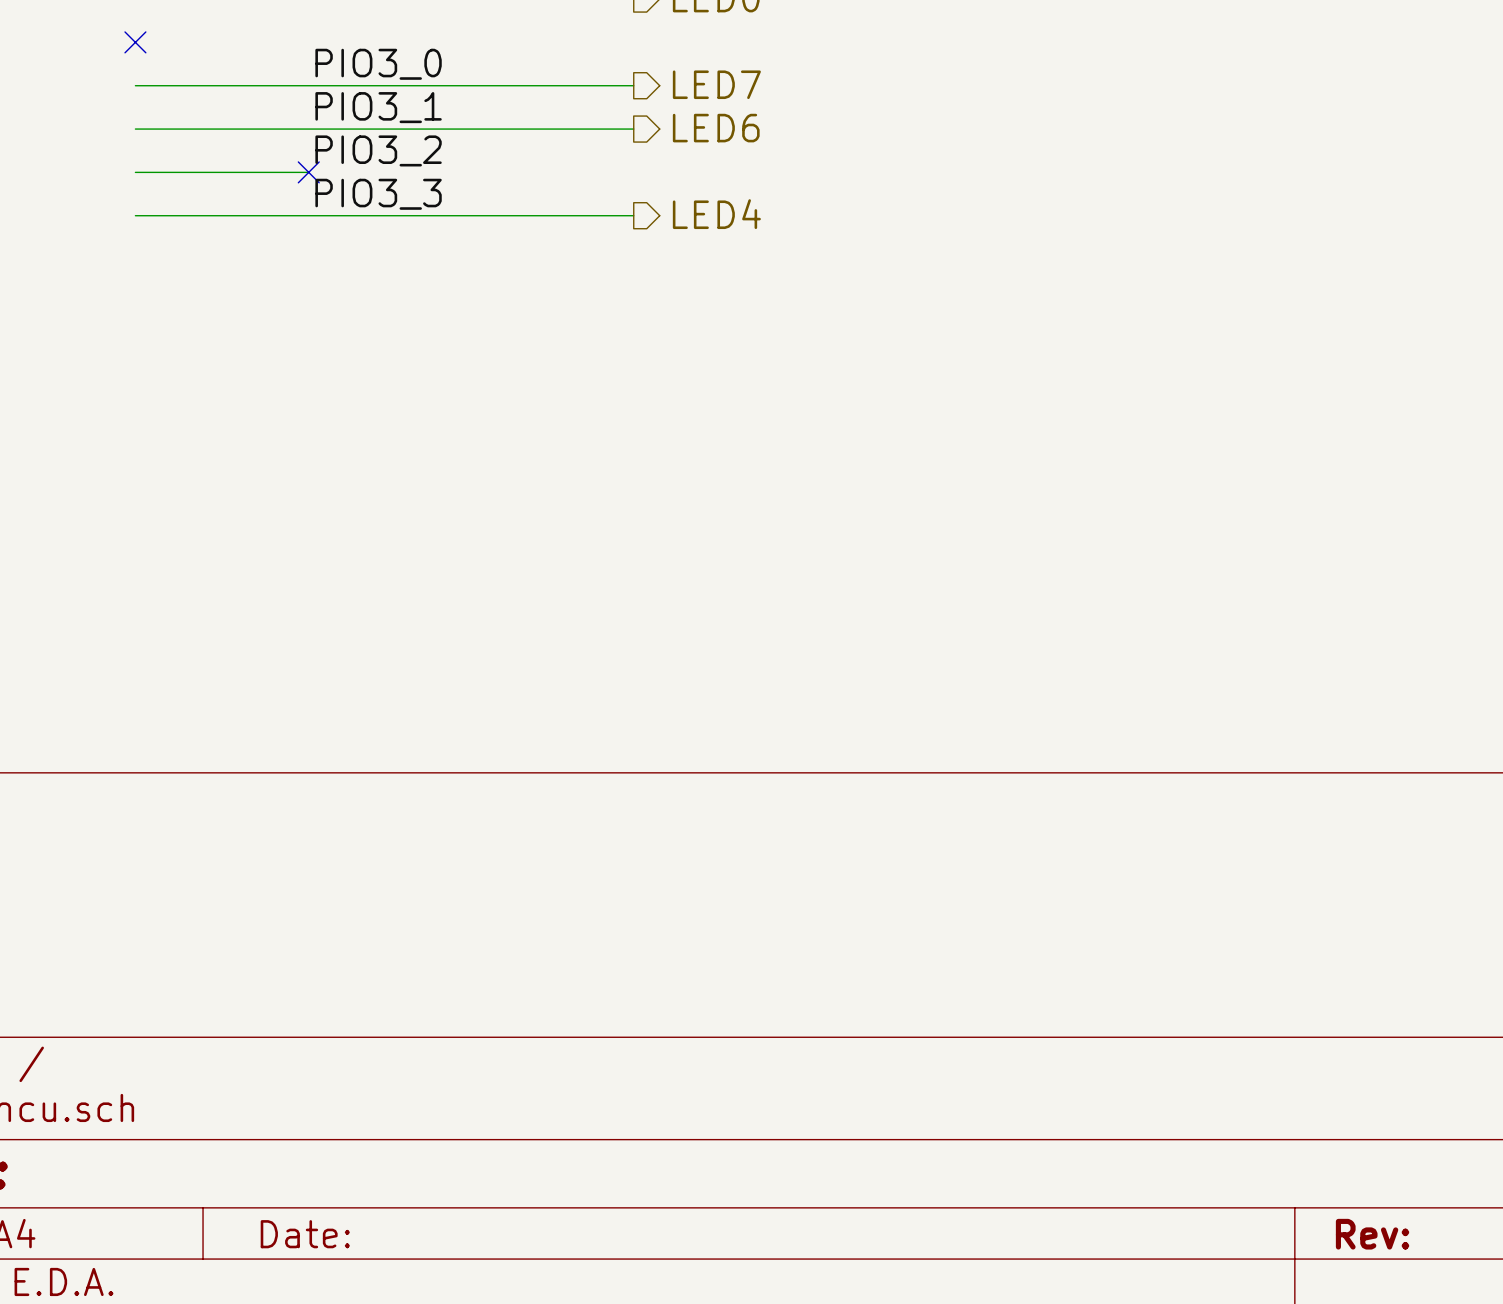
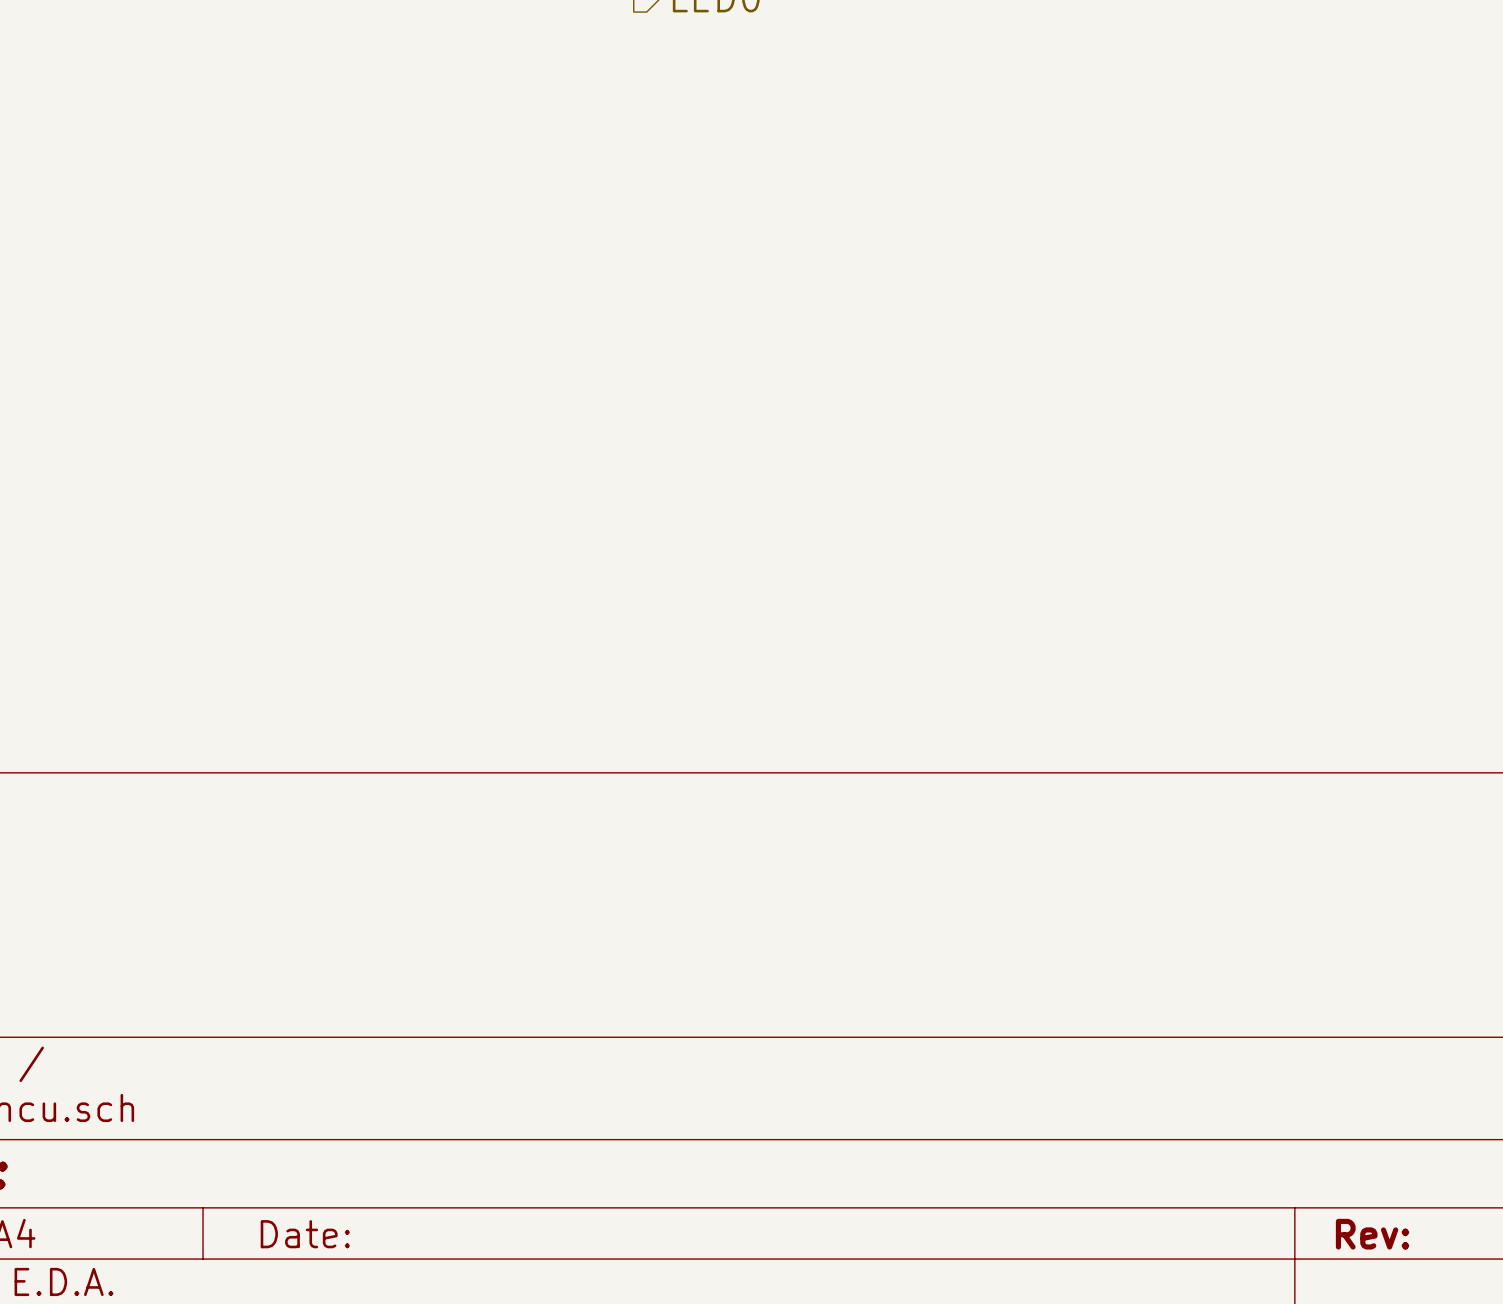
no-connect mark: (135, 42) -> none
label: PIO3_0 (378, 64) -> none
hierarchical label: LED7 (716, 84) -> none
wire: (135, 85) (633, 85) -> none
label: PIO3_1 (378, 107) -> none
hierarchical label: LED6 (716, 128) -> none
wire: (135, 129) (633, 129) -> none
label: PIO3_2 (378, 150) -> none
wire: (135, 172) (308, 172) -> none
no-connect mark: (308, 172) -> none
label: PIO3_3 (378, 194) -> none
hierarchical label: LED4 (716, 214) -> none
wire: (135, 215) (633, 215) -> none

